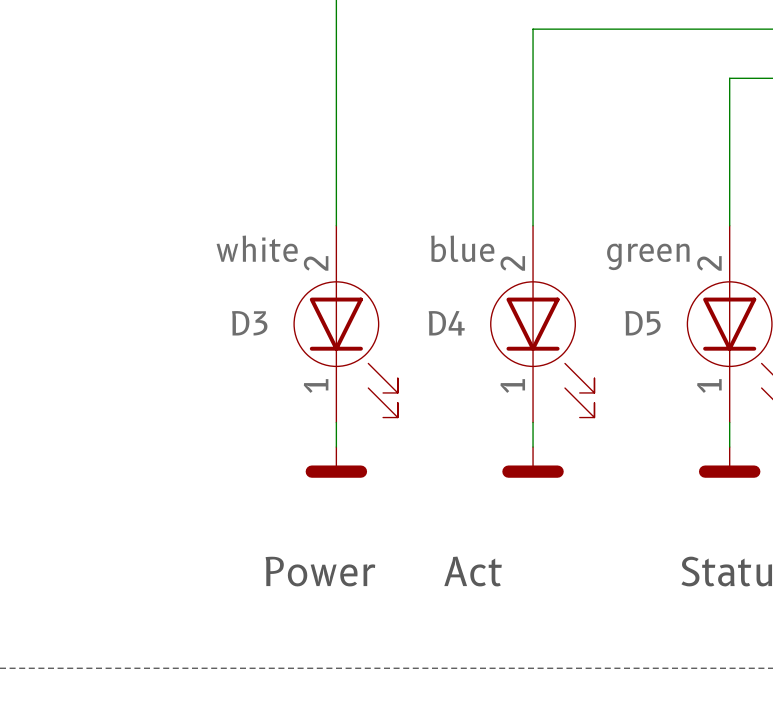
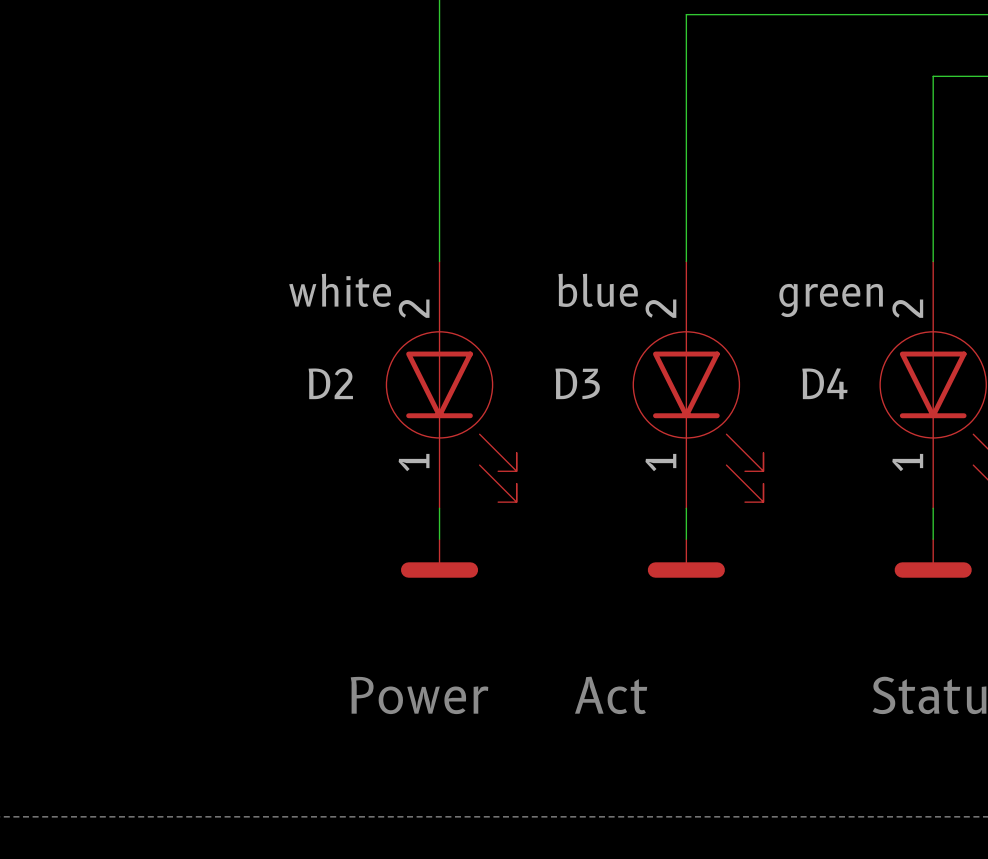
D3 name: D3 (249, 323) -> D2 (330, 383)
D4 name: D4 (446, 323) -> D3 (577, 383)
D5 name: D5 (642, 323) -> D4 (824, 383)

